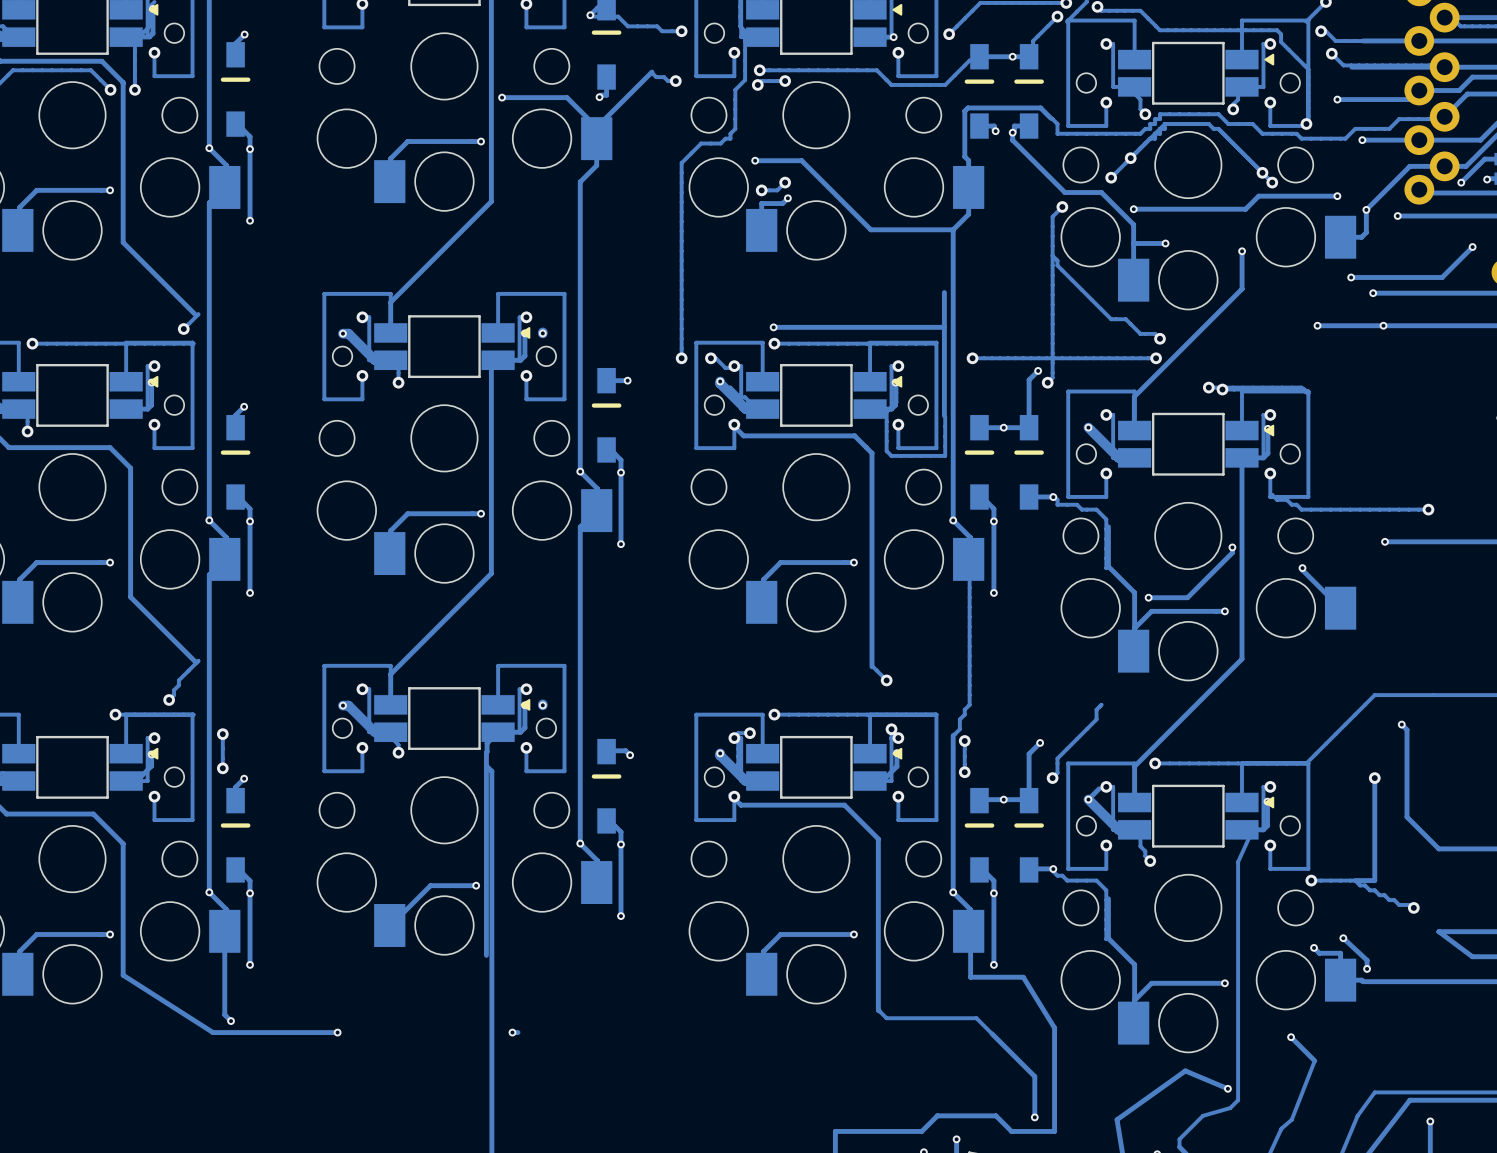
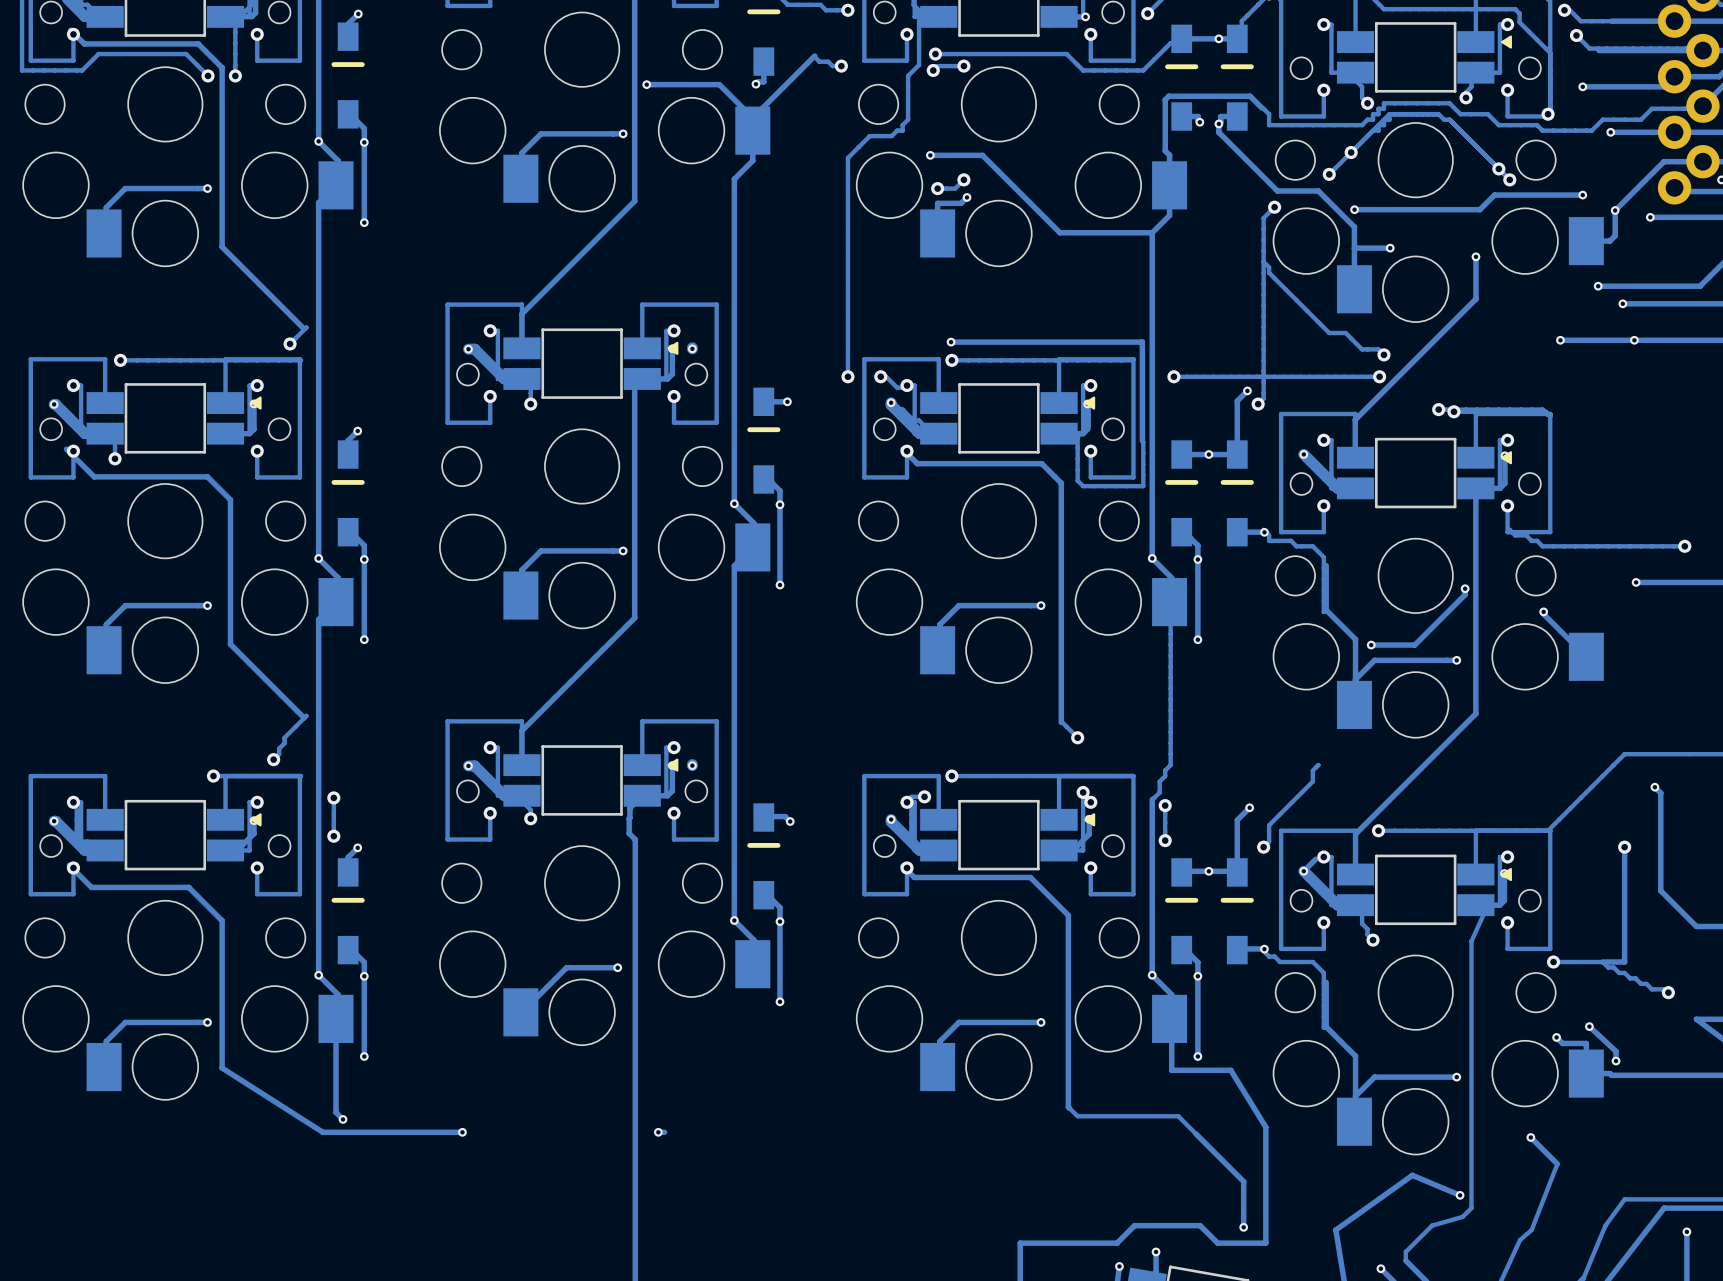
track: (944, 292) (944, 327) -> none
track: (486, 752) (486, 955) -> (629, 818) (629, 833)

